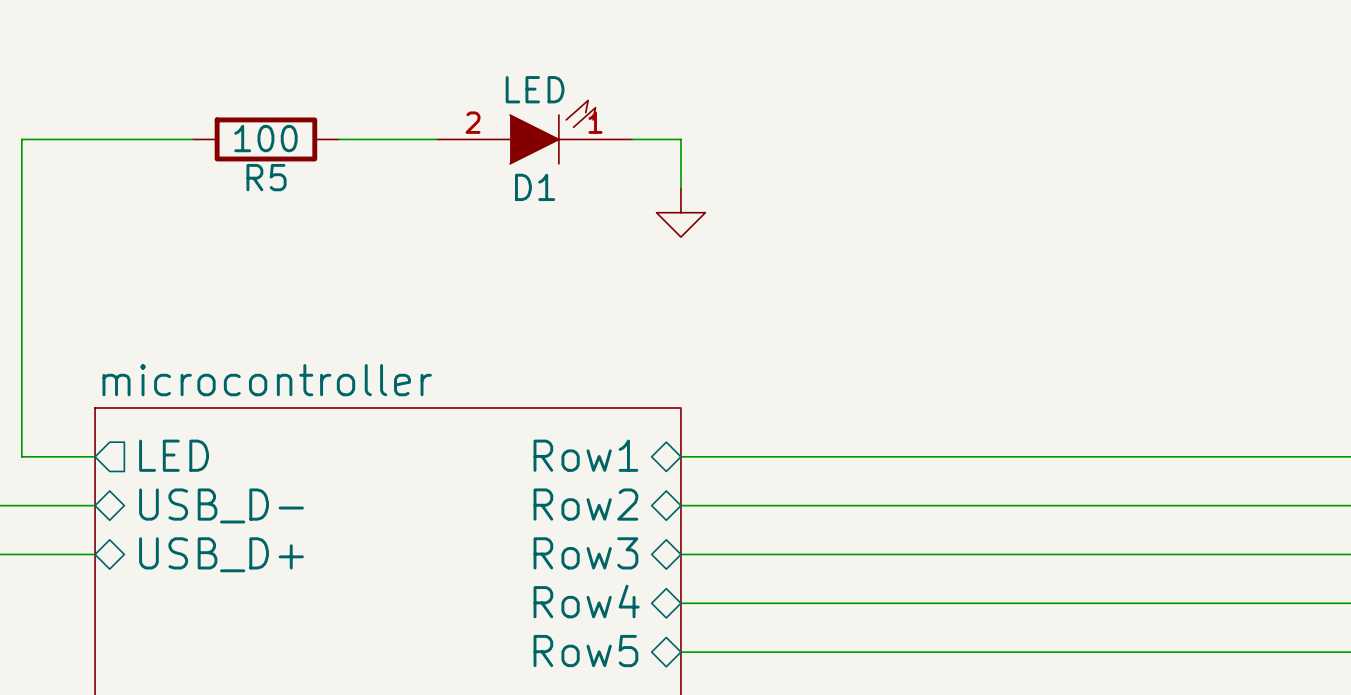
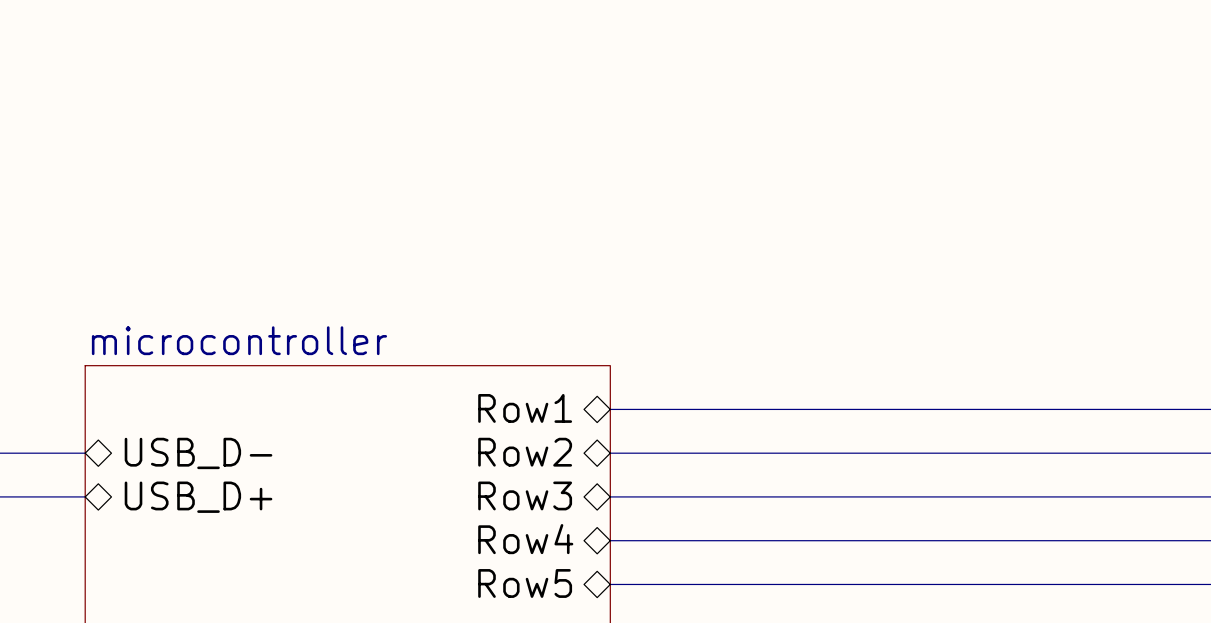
D1: LED (534, 132) -> none
wire: (192, 139) (21, 139) (21, 456) (95, 456) -> none
R5: 100 (265, 139) -> none
wire: (339, 139) (436, 139) -> none
wire: (632, 139) (680, 139) (680, 188) -> none
power symbol: (680, 212) -> none
sheet pin: LED (174, 455) -> none

